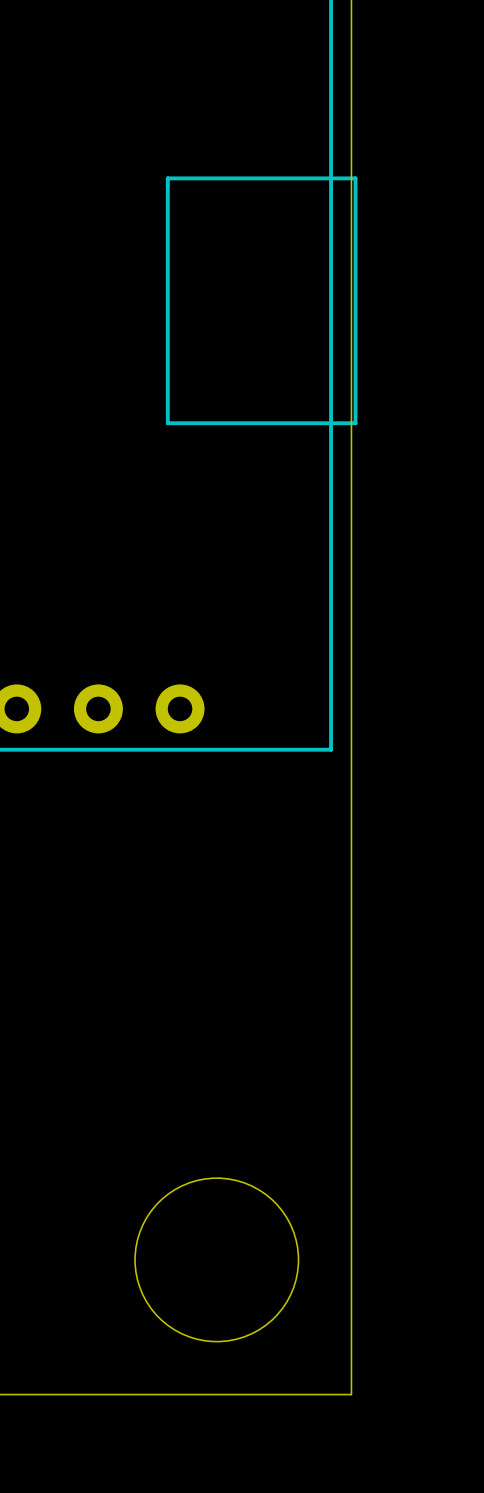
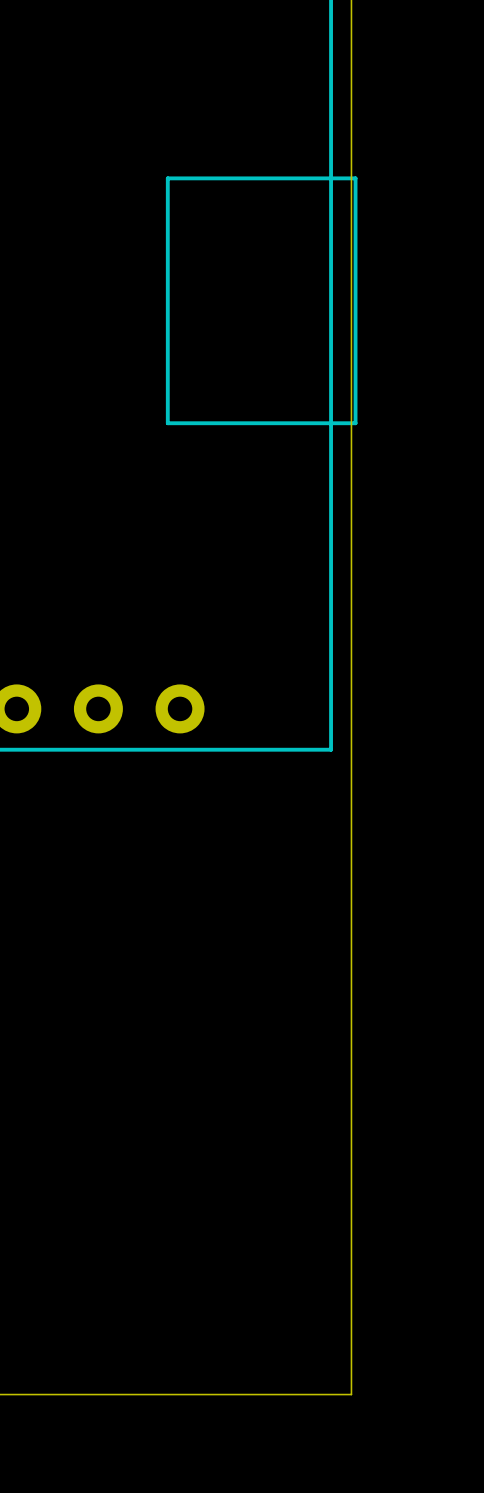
round board edge: [134, 1177, 300, 1343] -> none

